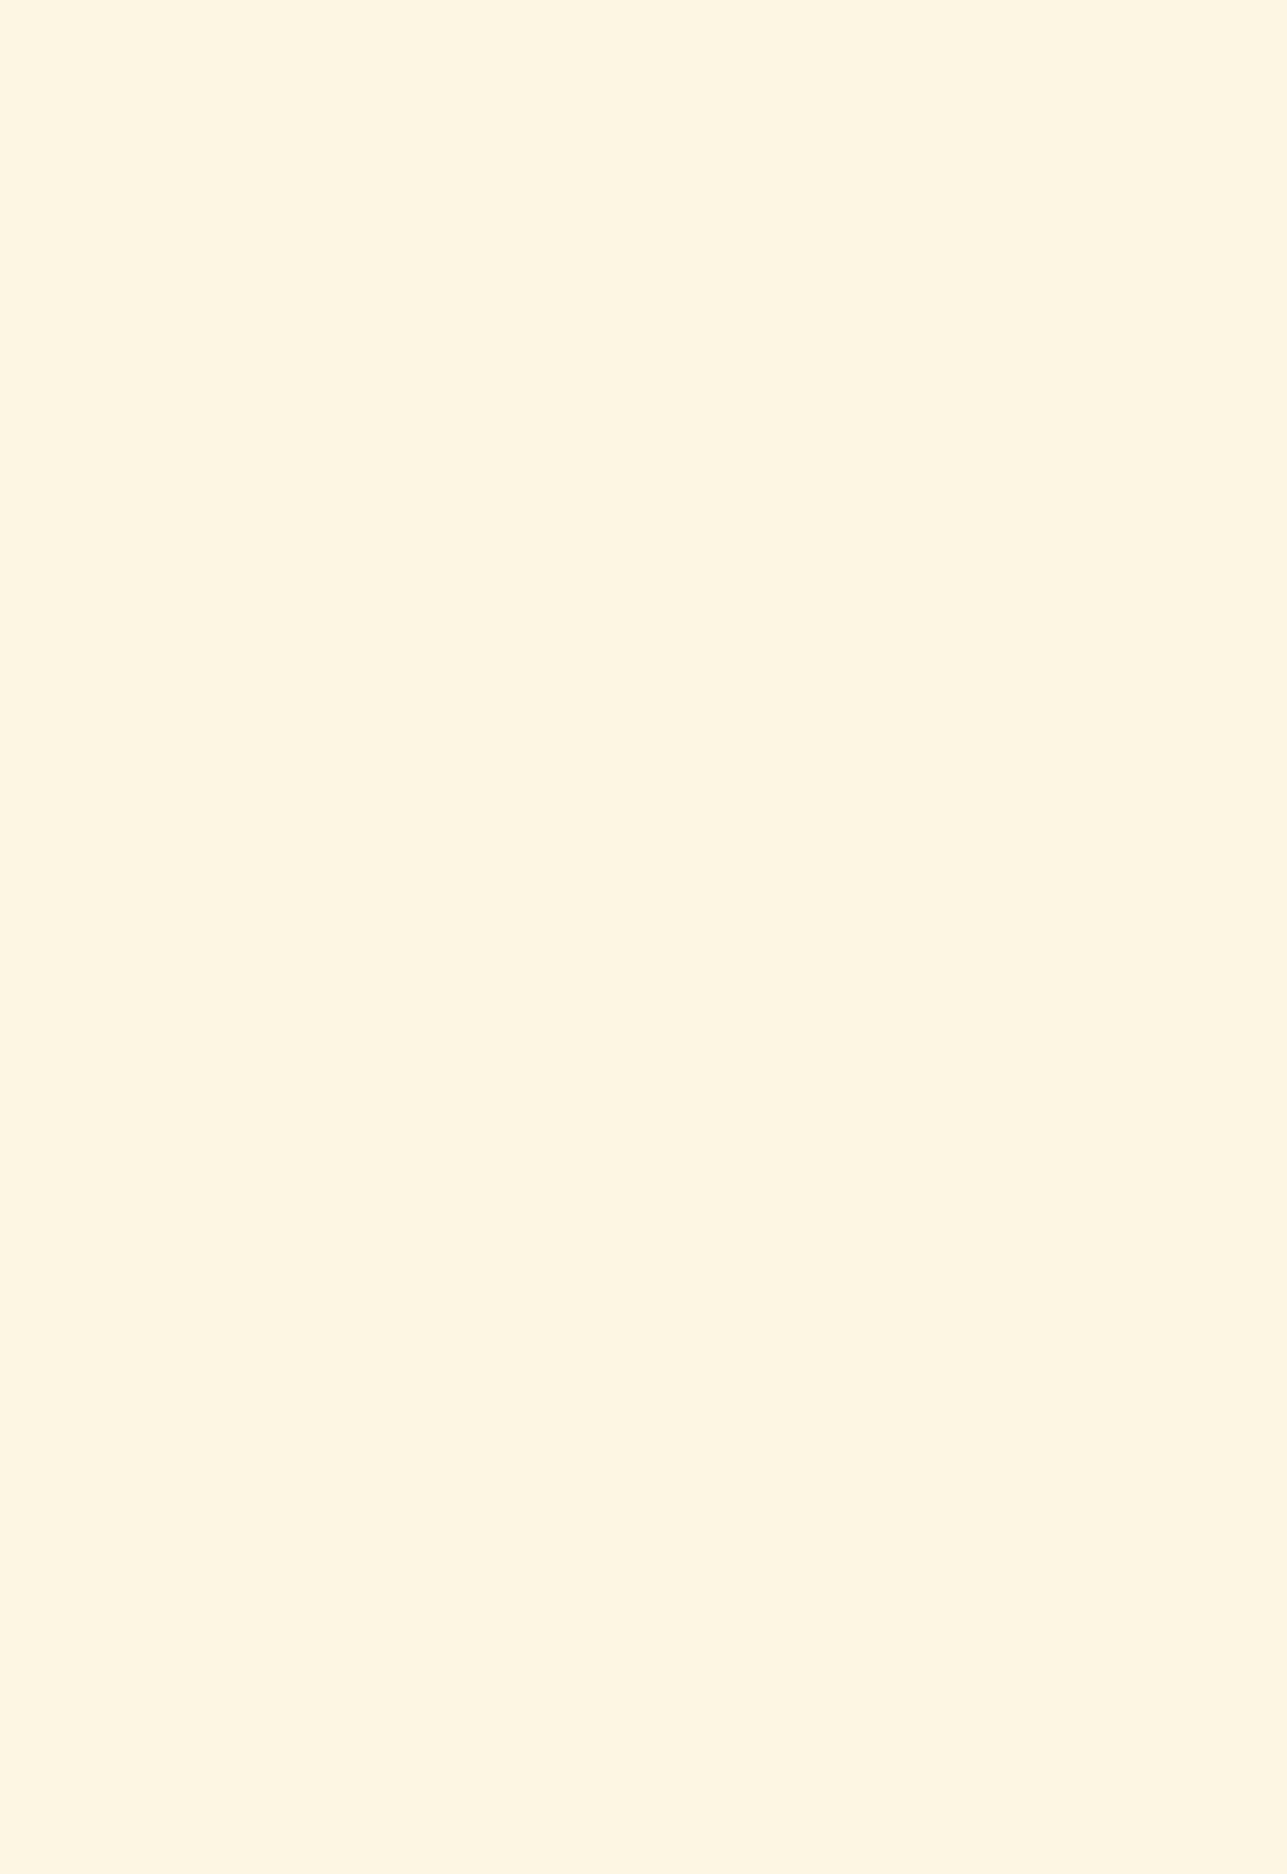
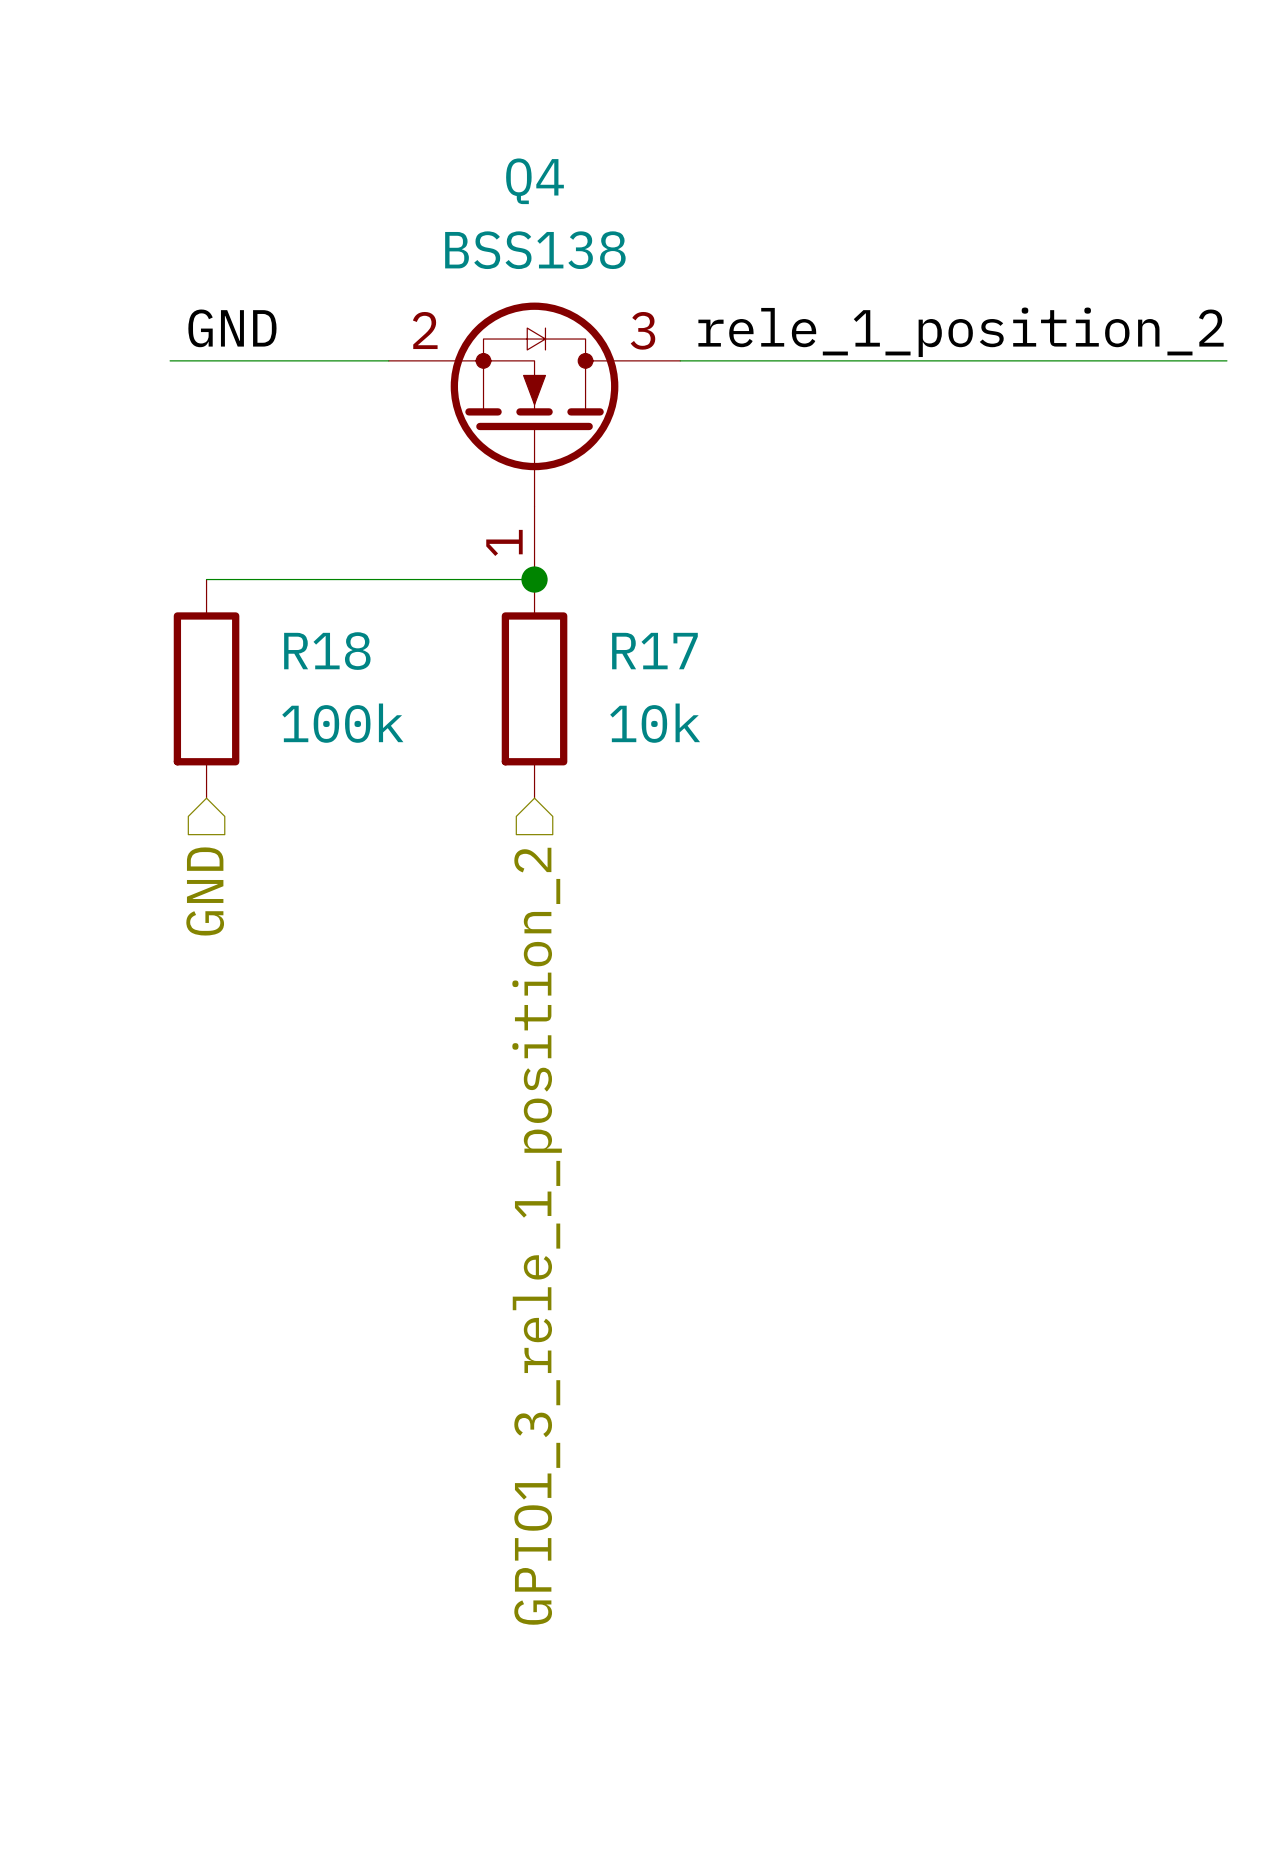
label: none -> GND (232, 328)
label: none -> rele_1_position_2 (961, 332)
wire: none -> (170, 360) (388, 360)
wire: none -> (680, 360) (1226, 360)
Q4: none -> BSS138 (534, 441)
wire: none -> (206, 579) (534, 579)
junction: none -> (534, 579)
R18: none -> 100k (206, 688)
R17: none -> 10k (534, 688)
hierarchical label: none -> GND (205, 891)
hierarchical label: none -> GPIO1_3_rele_1_position_2 (537, 1236)

